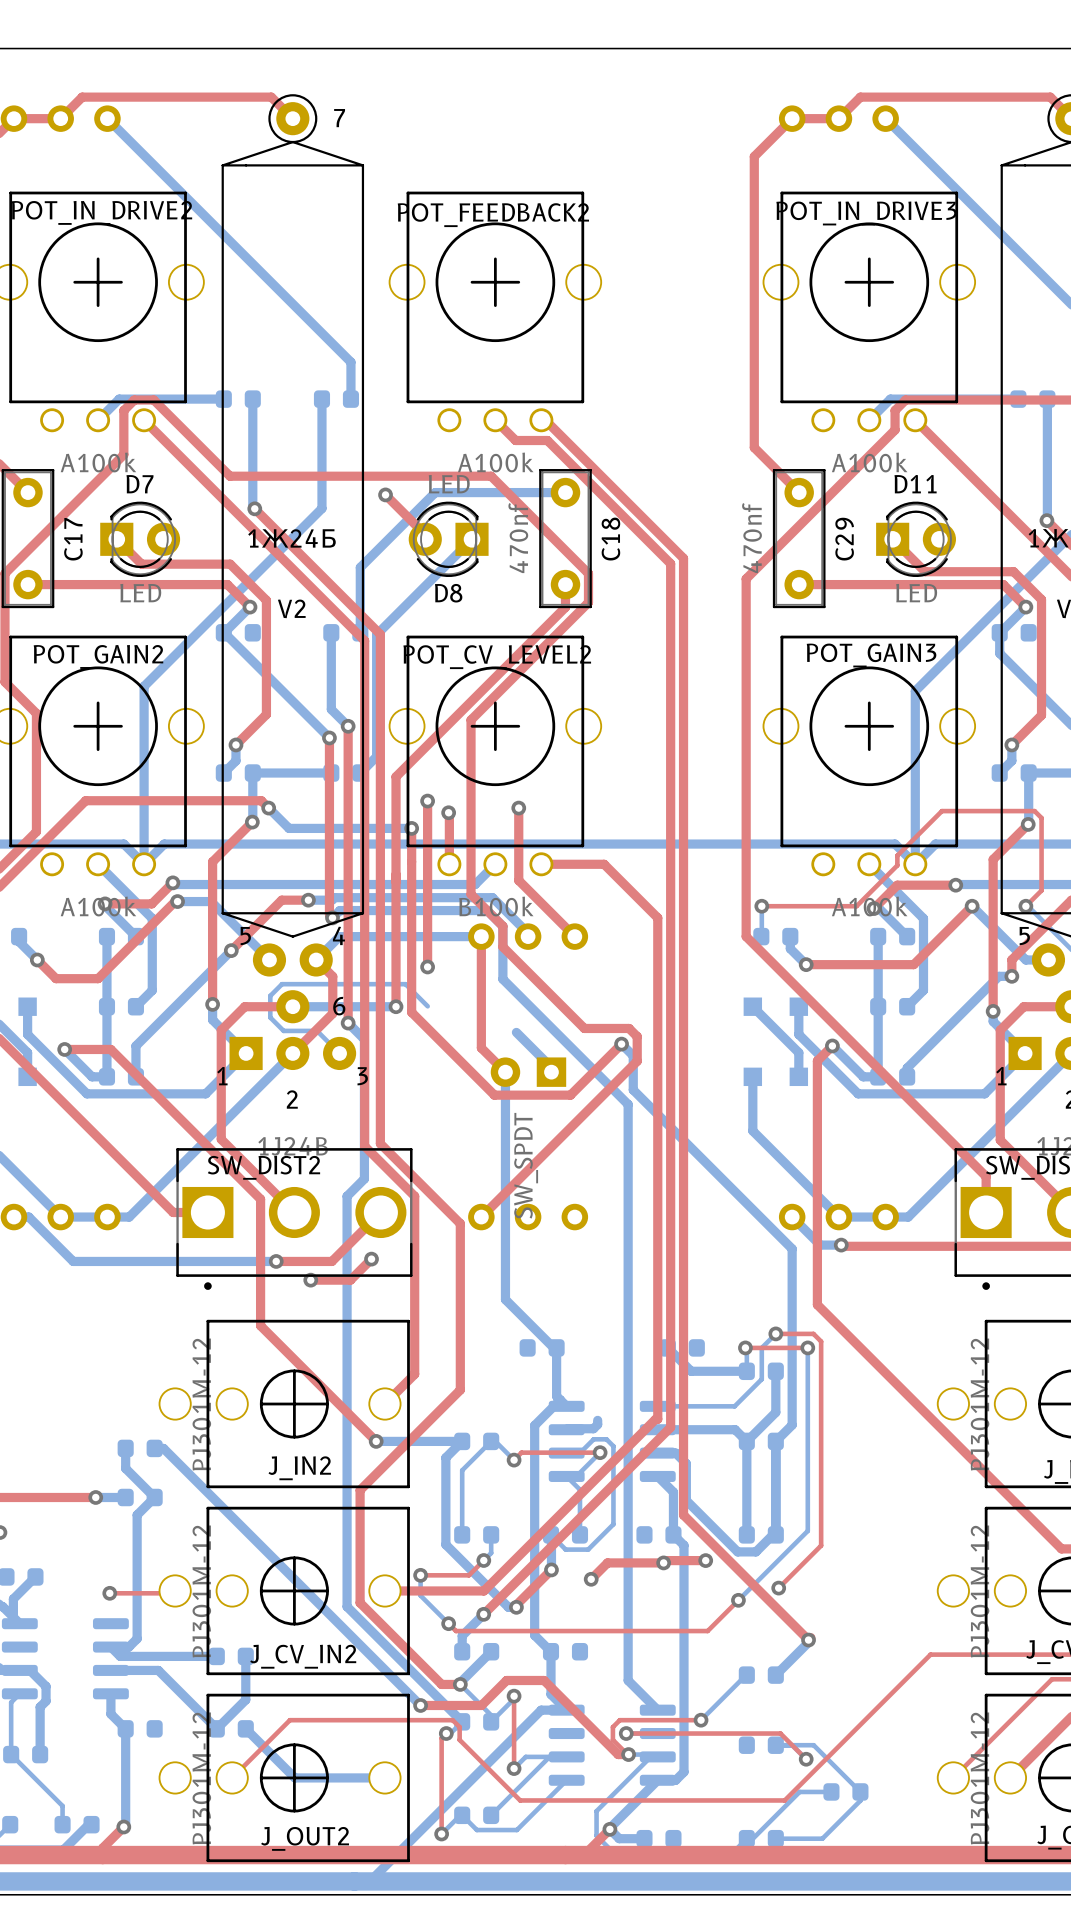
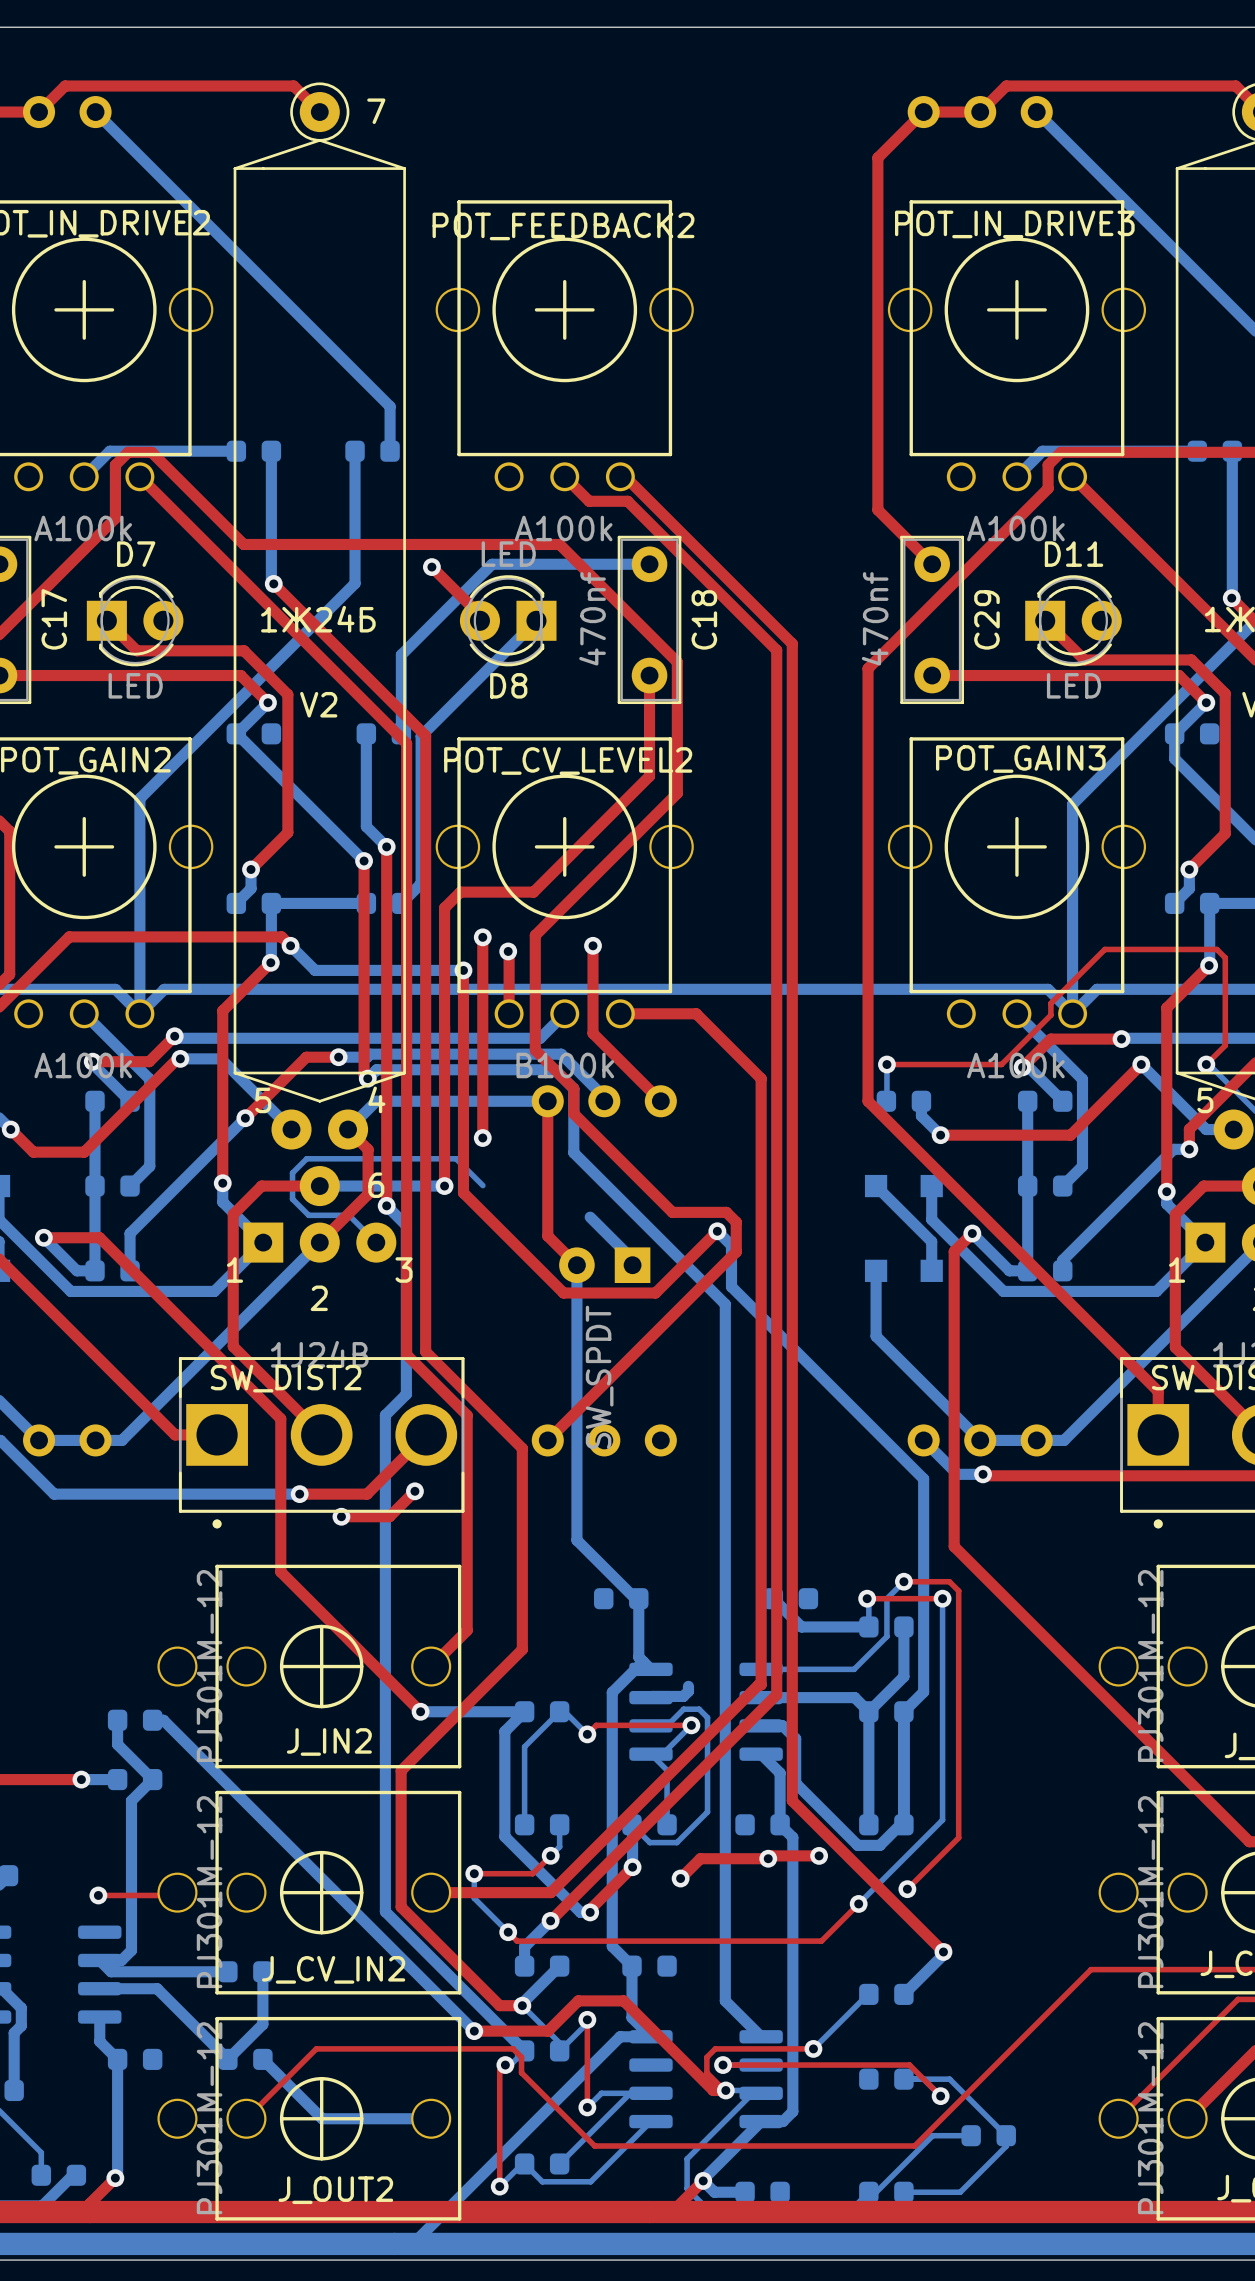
top track: (588, 602) (471, 720) (471, 799) -> (677, 697) (677, 793) (535, 935)
top track: (565, 607) (409, 763) -> (649, 703) (649, 776) (533, 892) (460, 892)

